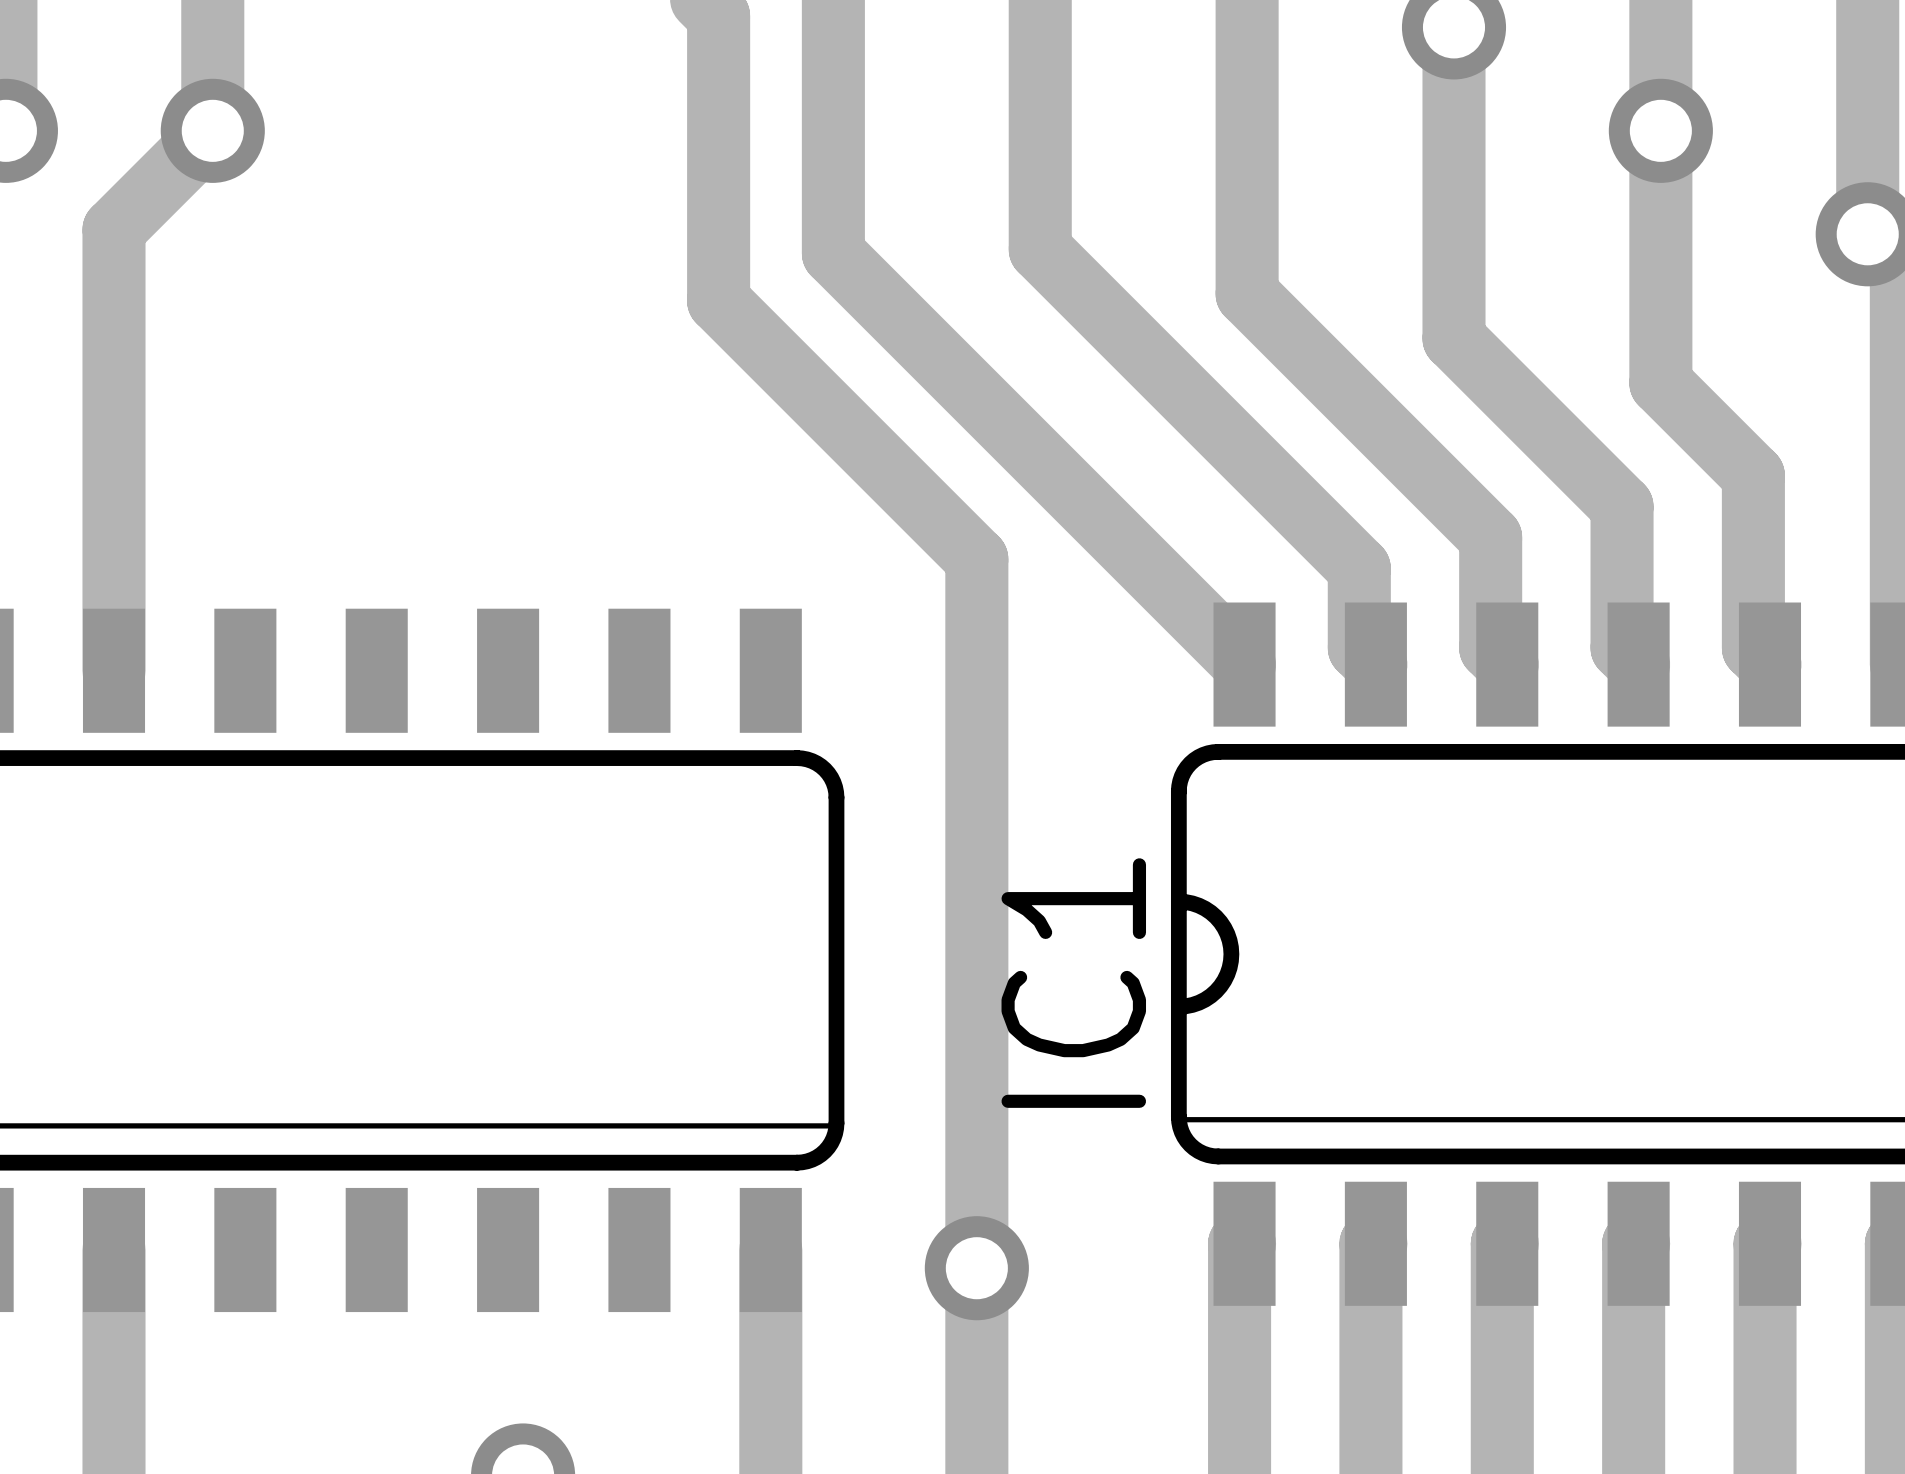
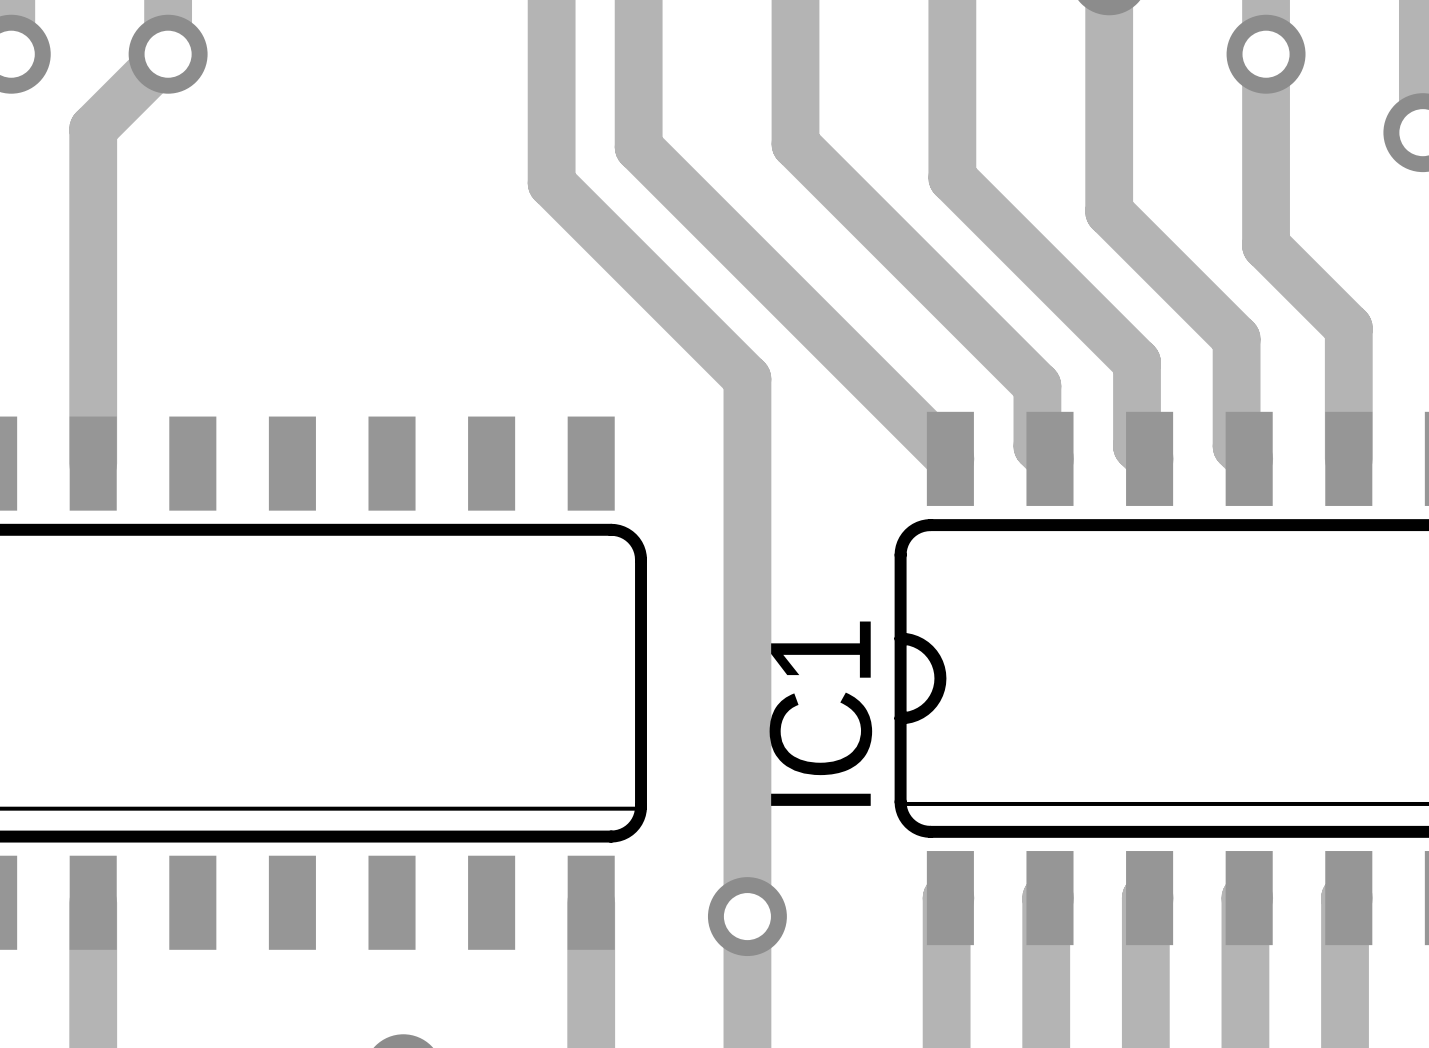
track: (1753, 475) (1753, 647) (1769, 664) -> (1336, 315) (1348, 328) (1348, 458)

